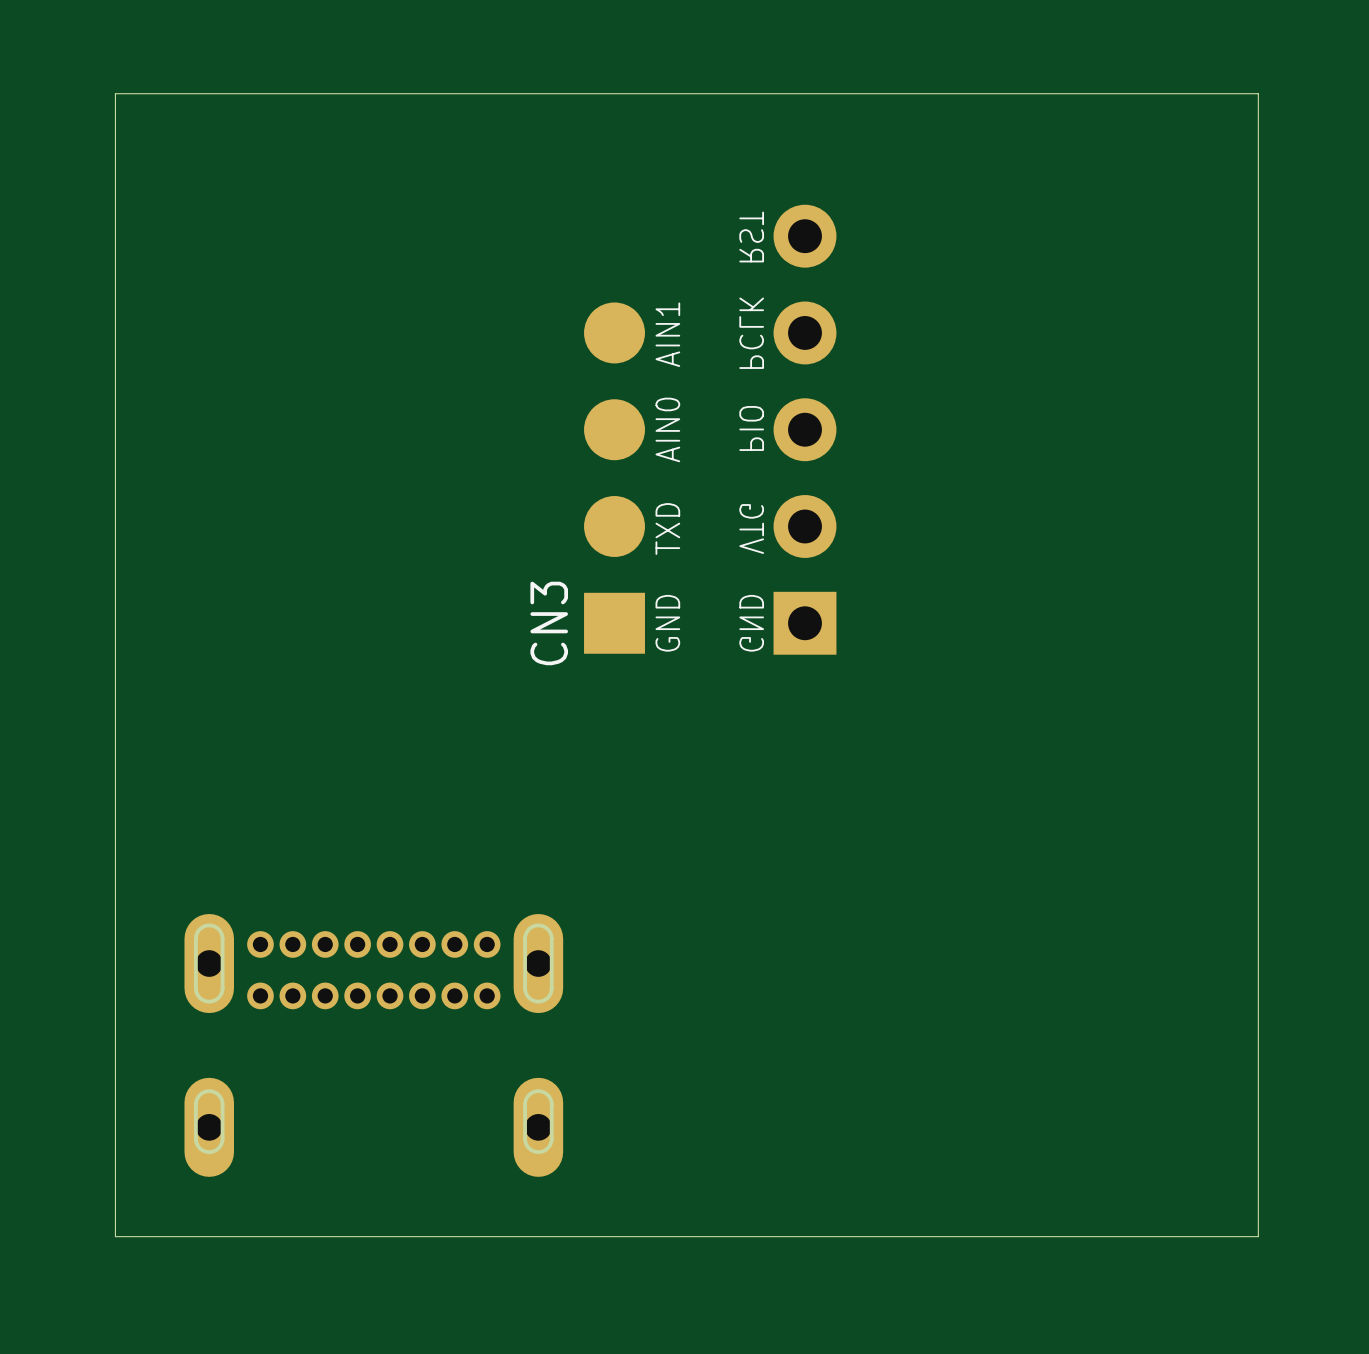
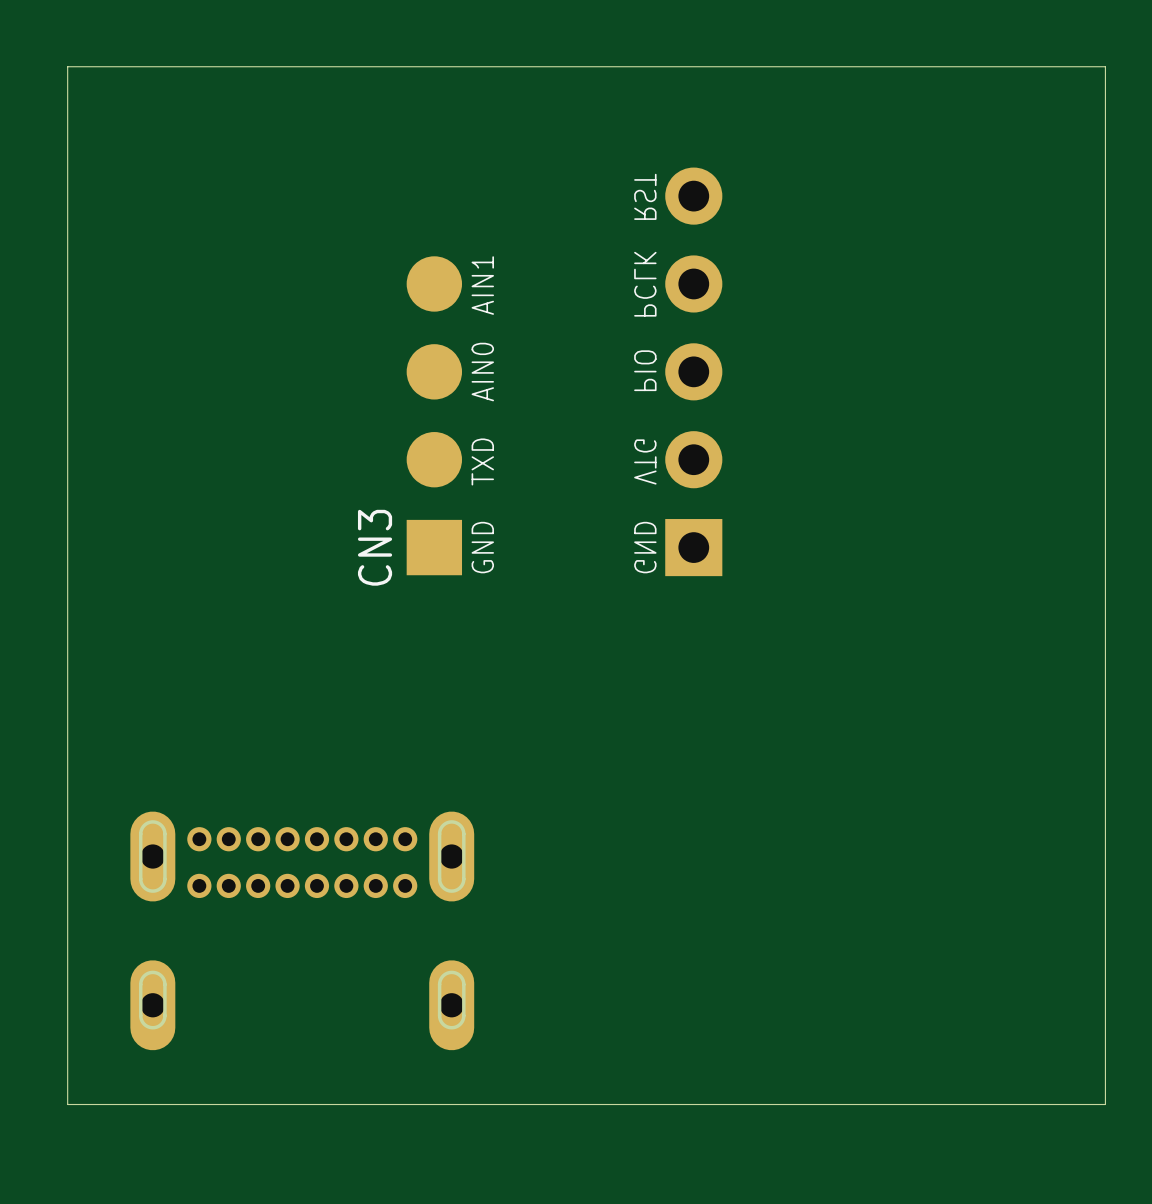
text position: AIN1 (667, 334) -> AIN1 (482, 285)
text position: AIN0 (667, 429) -> AIN0 (482, 372)
CN3 position: (614, 478) -> (434, 415)
text position: TXD (667, 529) -> TXD (482, 461)
text position: GND (667, 623) -> GND (482, 547)

